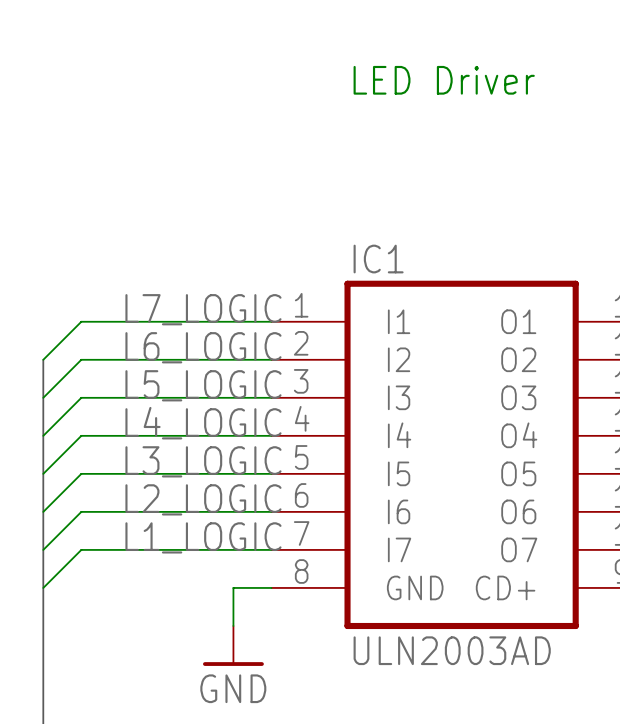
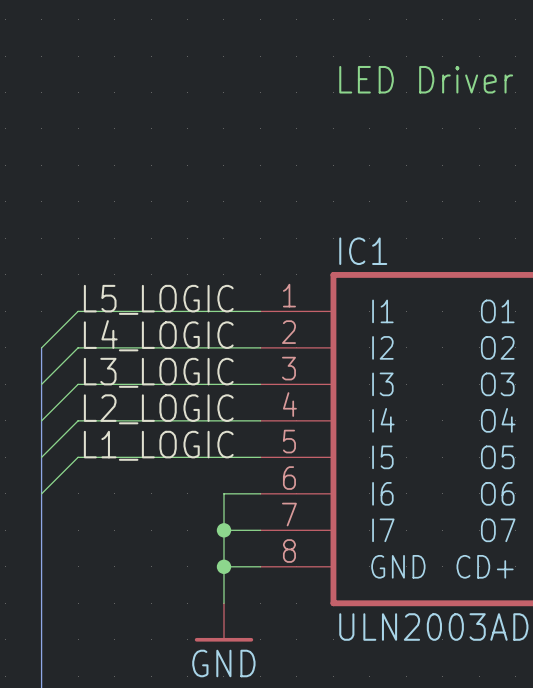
label: L7_LOGIC (203, 309) -> none
label: L6_LOGIC (203, 347) -> none
label position: L5_LOGIC (203, 385) -> L5_LOGIC (158, 299)
label position: L4_LOGIC (203, 423) -> L4_LOGIC (158, 335)
label position: L3_LOGIC (203, 461) -> L3_LOGIC (158, 372)
label position: L2_LOGIC (203, 499) -> L2_LOGIC (158, 409)
wire: (233, 511) (81, 511) (43, 549) -> (223, 493) (223, 566)
label position: L1_LOGIC (203, 537) -> L1_LOGIC (158, 445)
wire: (233, 549) (81, 549) (43, 587) -> none
junction: none -> (223, 530)
junction: none -> (223, 566)

